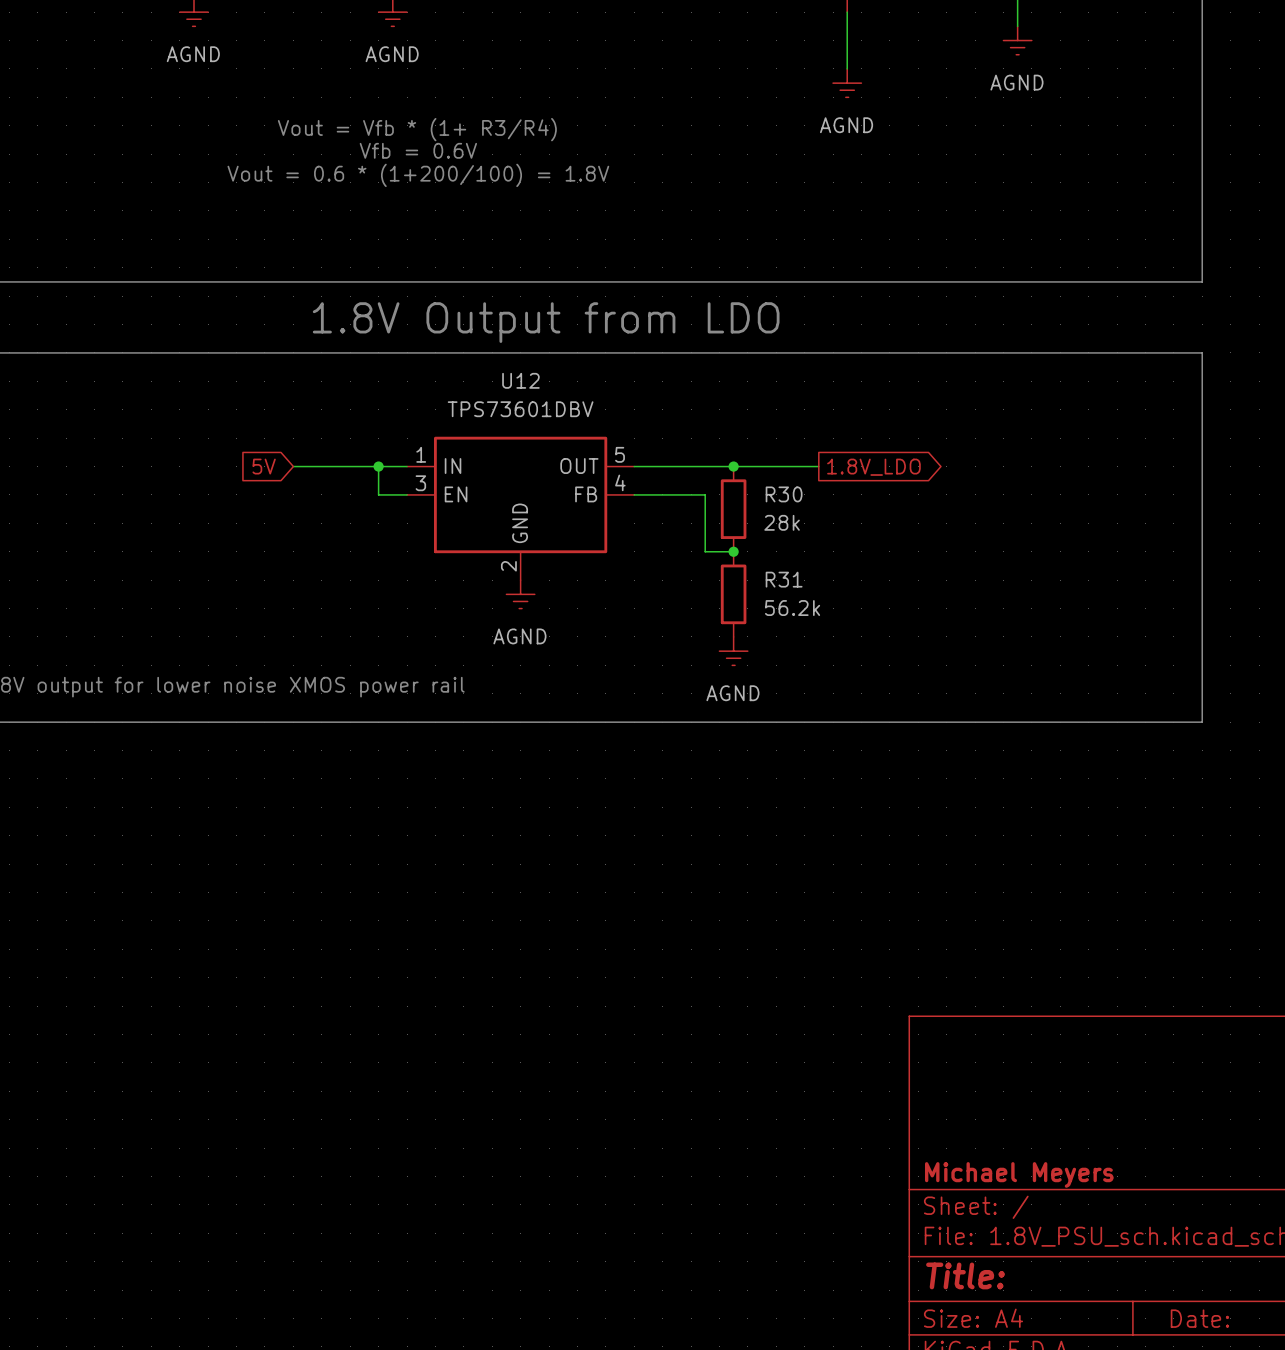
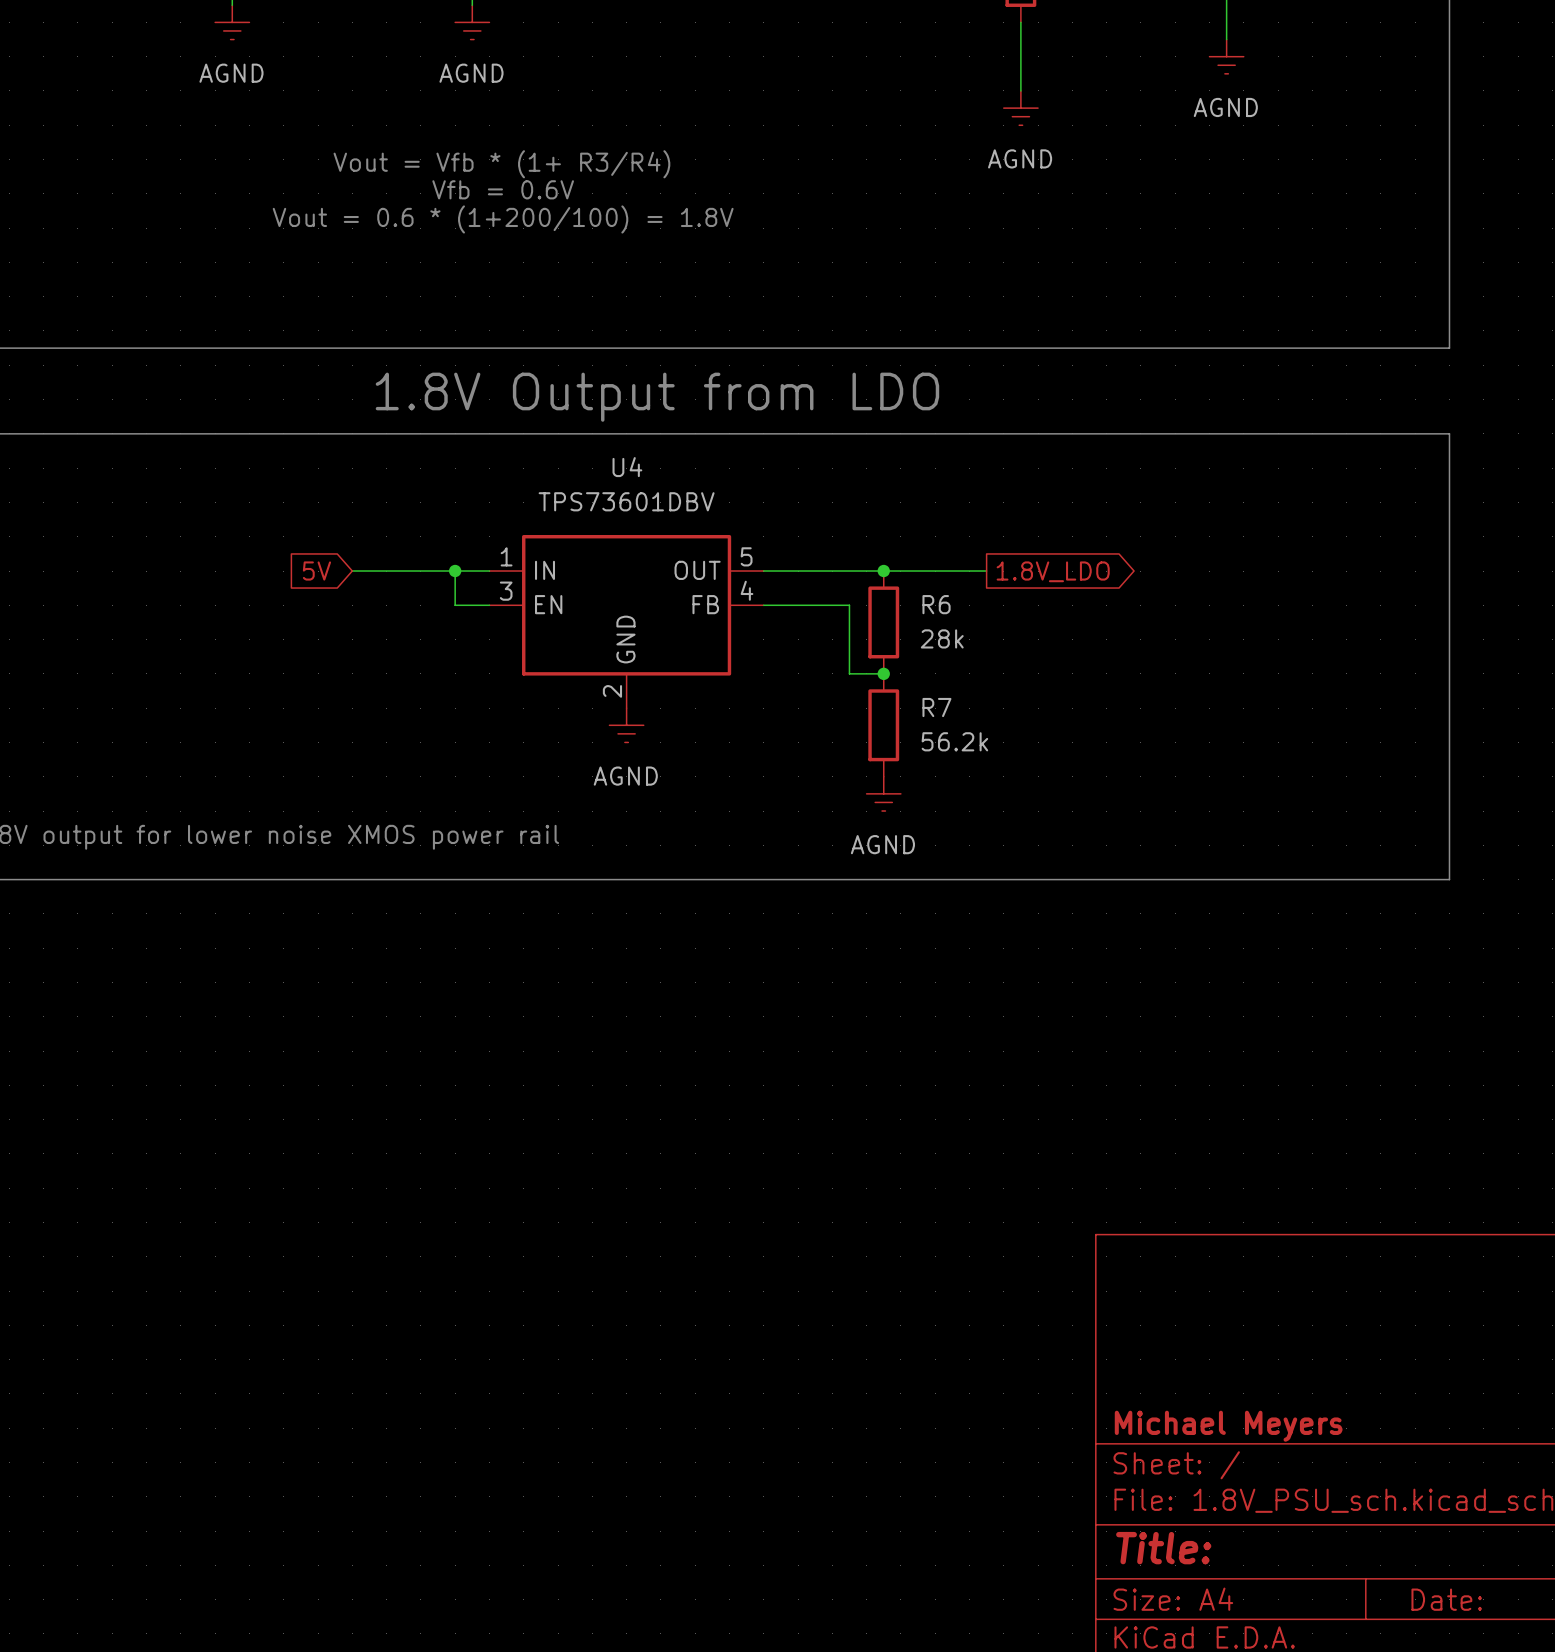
U12 name: U12 (520, 380) -> U4 (627, 467)
R30 name: R30 (784, 494) -> R6 (936, 604)
R31 name: R31 (784, 579) -> R7 (936, 707)

